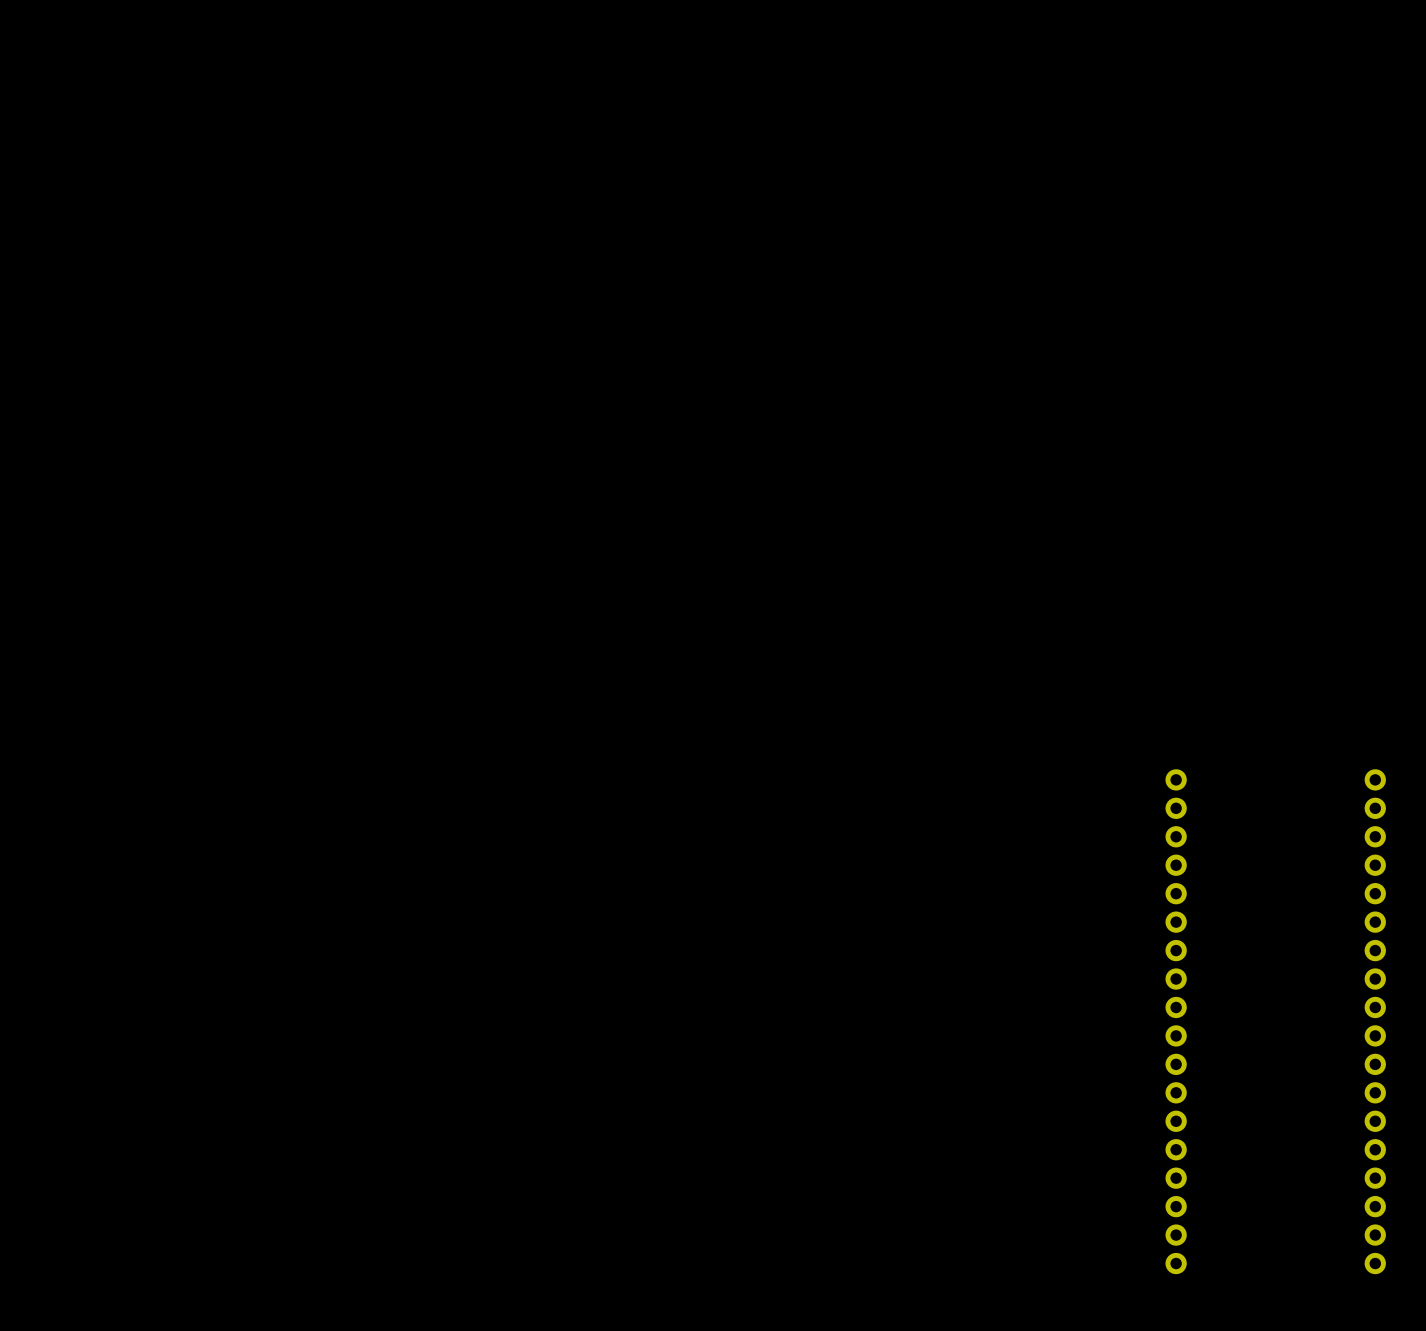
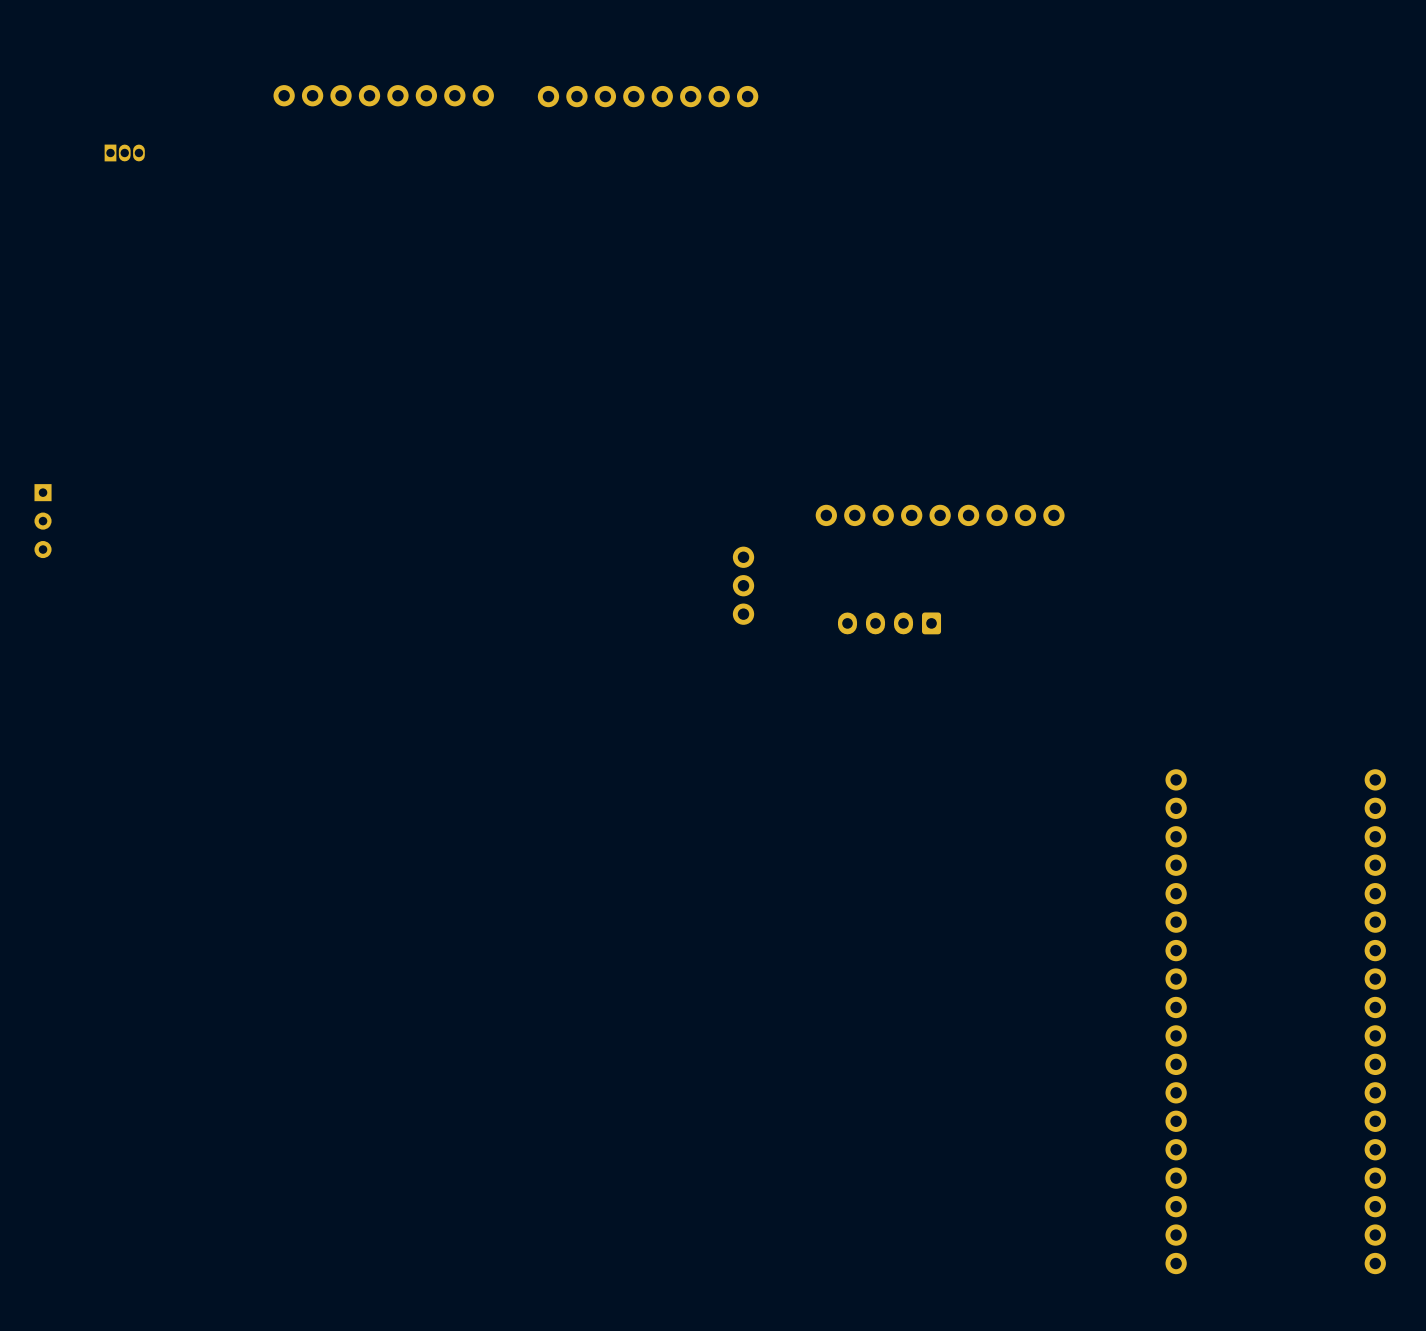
part: none -> (383, 95)
part: none -> (648, 96)
part: none -> (124, 152)
part: none -> (940, 515)
part: none -> (43, 521)
part: none -> (743, 585)
part: none -> (889, 623)

